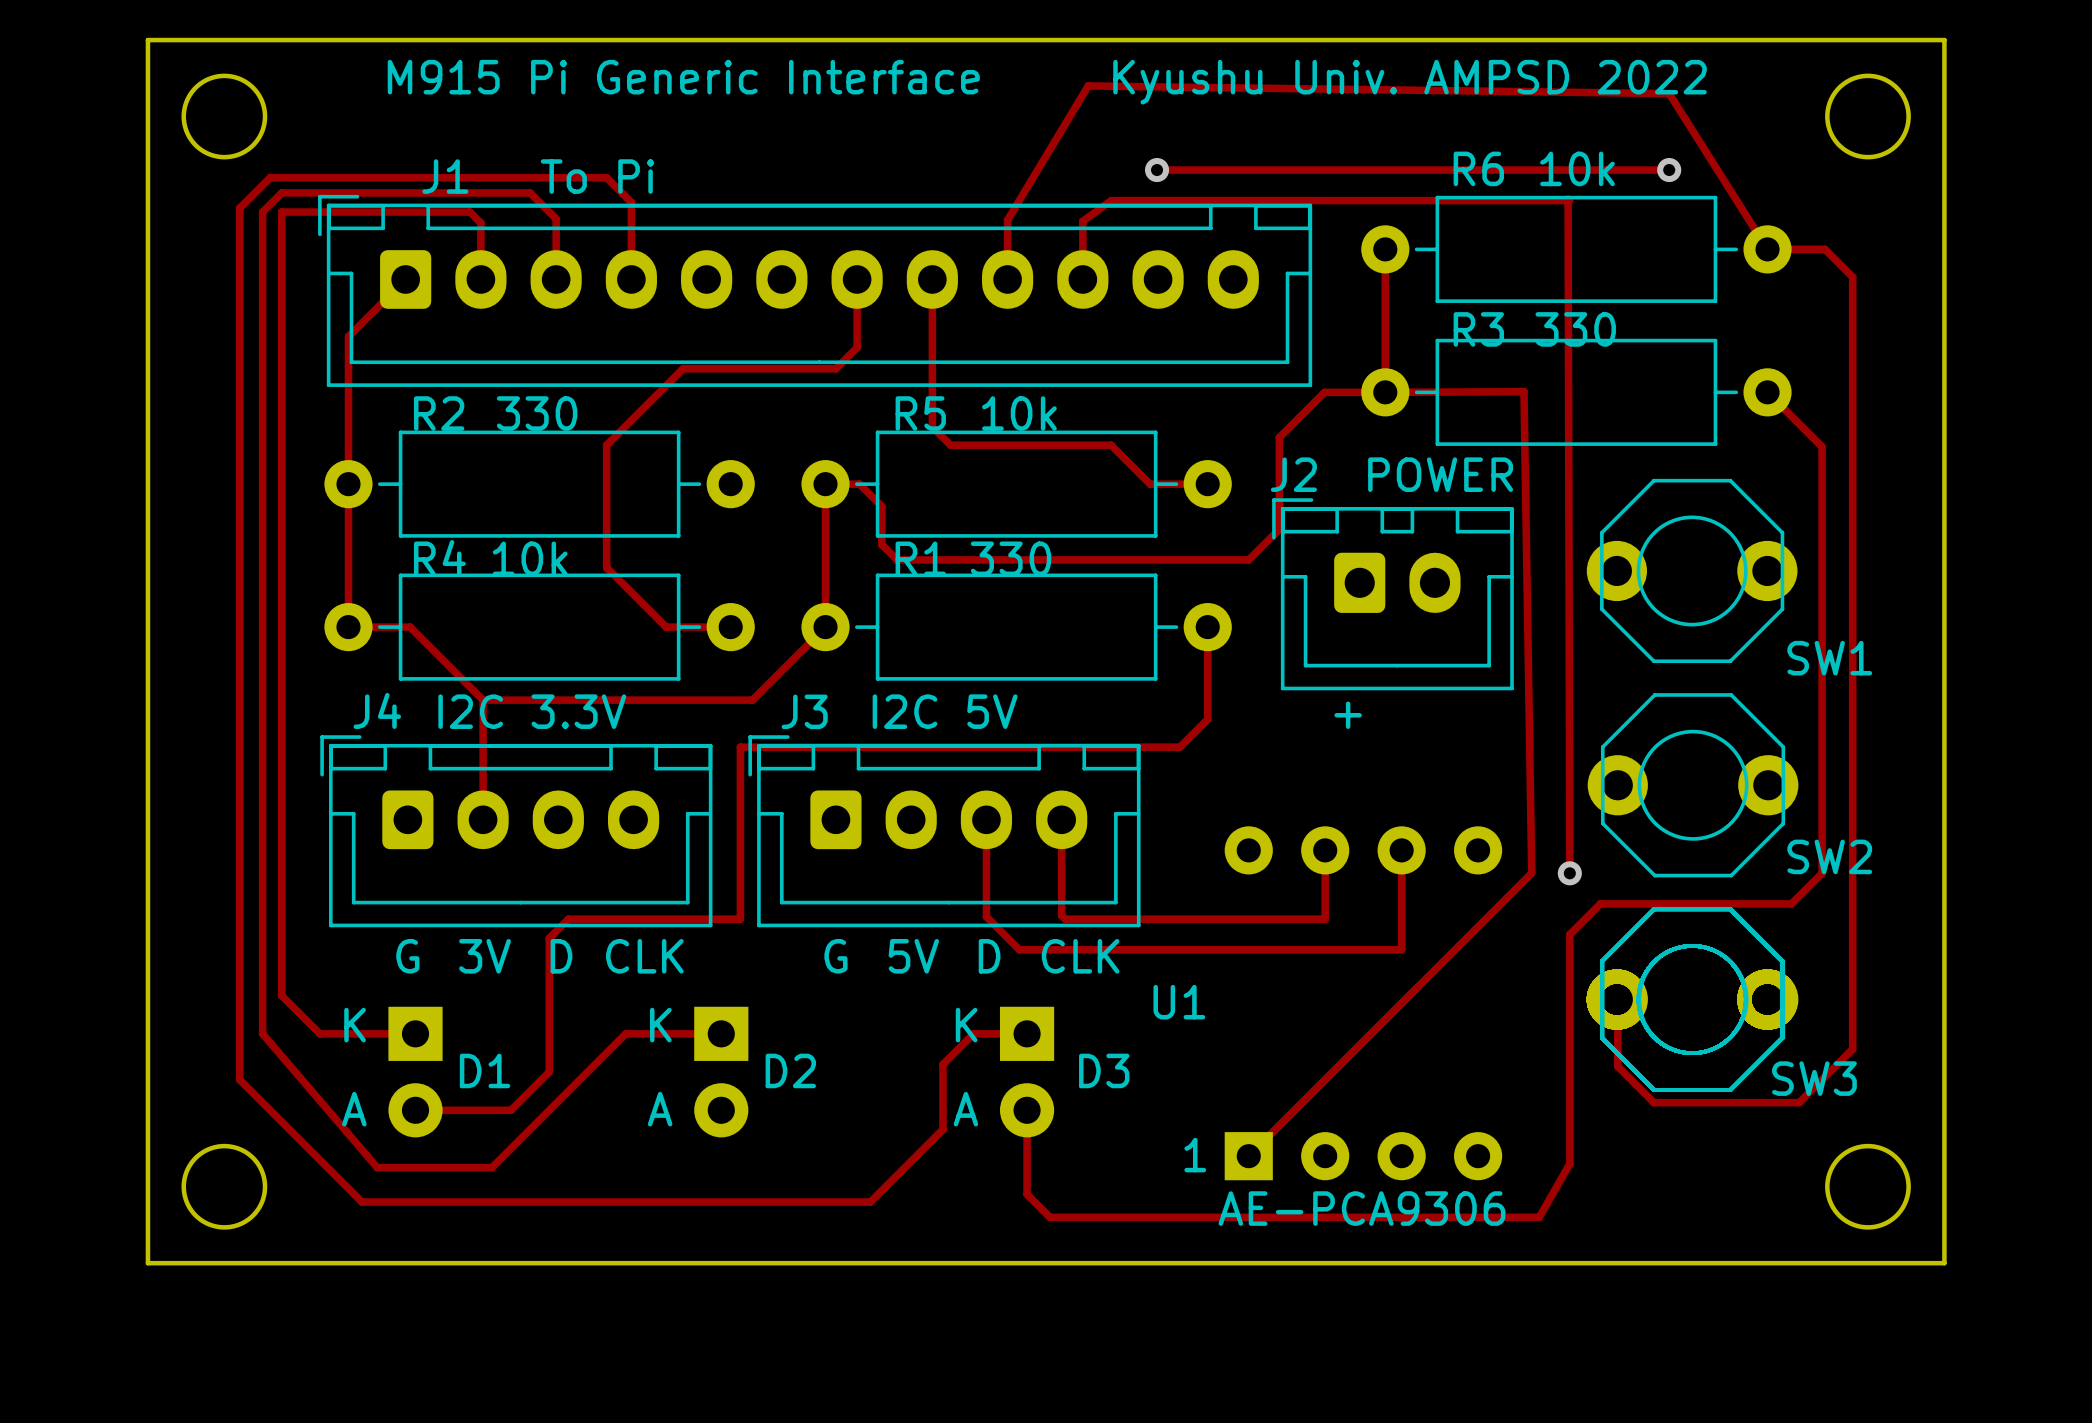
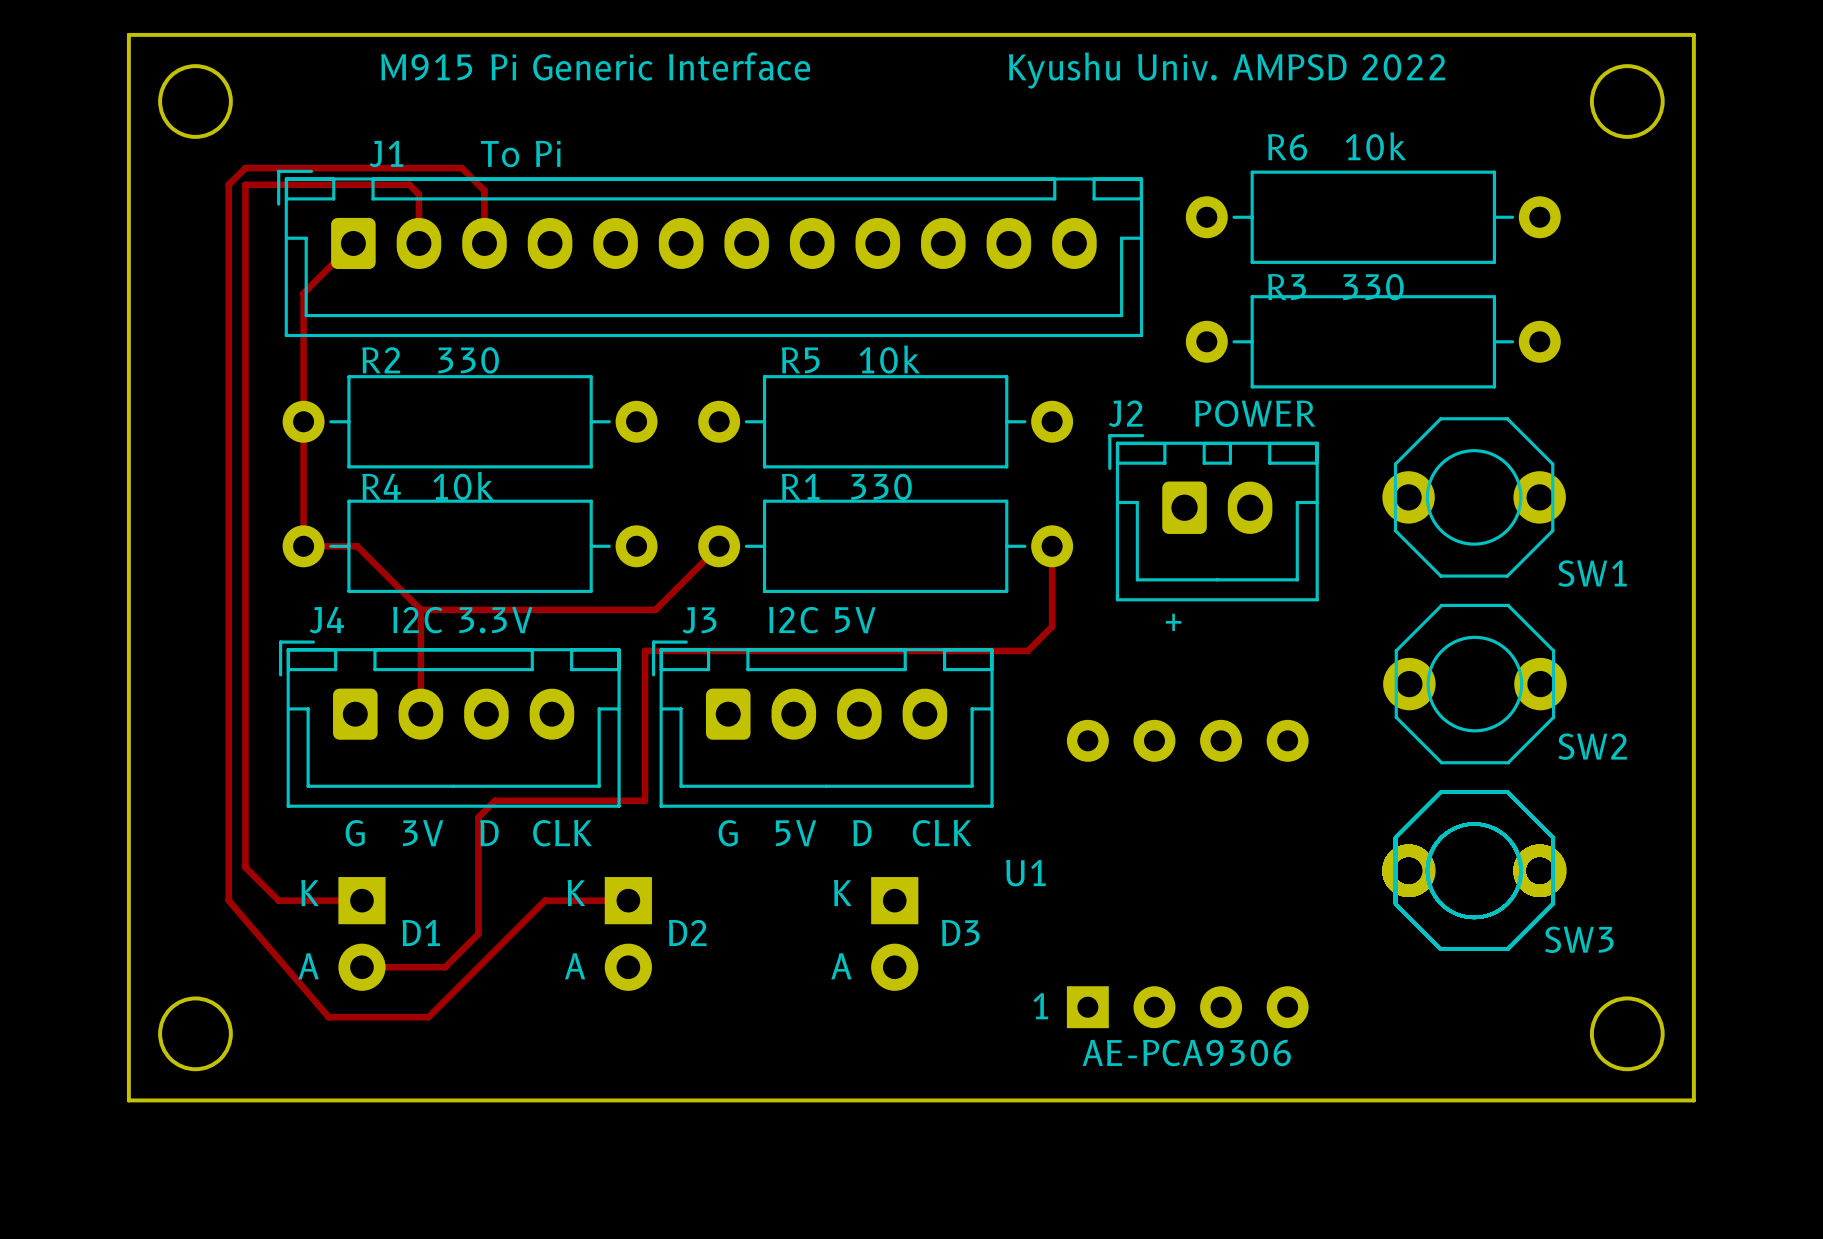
track: (1157, 170) (1669, 170) -> none
via: (1157, 170) -> none
via: (1669, 170) -> none
track: (1568, 198) (1569, 873) -> none
track: (1569, 200) (1111, 200) (1082, 221) (1082, 279) -> none
track: (1385, 249) (1385, 392) -> none
track: (631, 279) (631, 202) (606, 177) (270, 177) (239, 208) (239, 1079) (361, 1202) (870, 1202) (942, 1129) (942, 1064) (973, 1033) (1027, 1033) -> none
track: (857, 279) (857, 347) (835, 368) (683, 368) (606, 445) (606, 567) (666, 627) (730, 627) -> none
track: (932, 279) (932, 426) (950, 445) (1111, 445) (1150, 484) (1207, 484) -> none
track: (1007, 279) (1007, 220) (1088, 85) (1669, 93) (1767, 249) (1825, 249) (1852, 277) (1852, 1049) (1799, 1102) (1653, 1102) (1617, 1066) (1617, 999) -> none
track: (1385, 392) (1523, 391) (1531, 873) (1248, 1156) -> none
track: (1385, 392) (1324, 392) (1279, 437) (1279, 529) (1248, 559) (897, 559) (881, 544) (881, 506) (859, 484) (825, 484) (825, 627) -> none
track: (1767, 392) (1822, 446) (1822, 873) (1791, 903) (1600, 903) (1569, 934) (1569, 1163) (1539, 1217) (1050, 1217) (1027, 1194) (1027, 1110) -> none
track: (986, 819) (986, 916) (1019, 949) (1401, 949) (1401, 850) -> none
track: (1061, 819) (1061, 915) (1065, 919) (1325, 919) (1325, 850) -> none
via: (1569, 873) -> none

